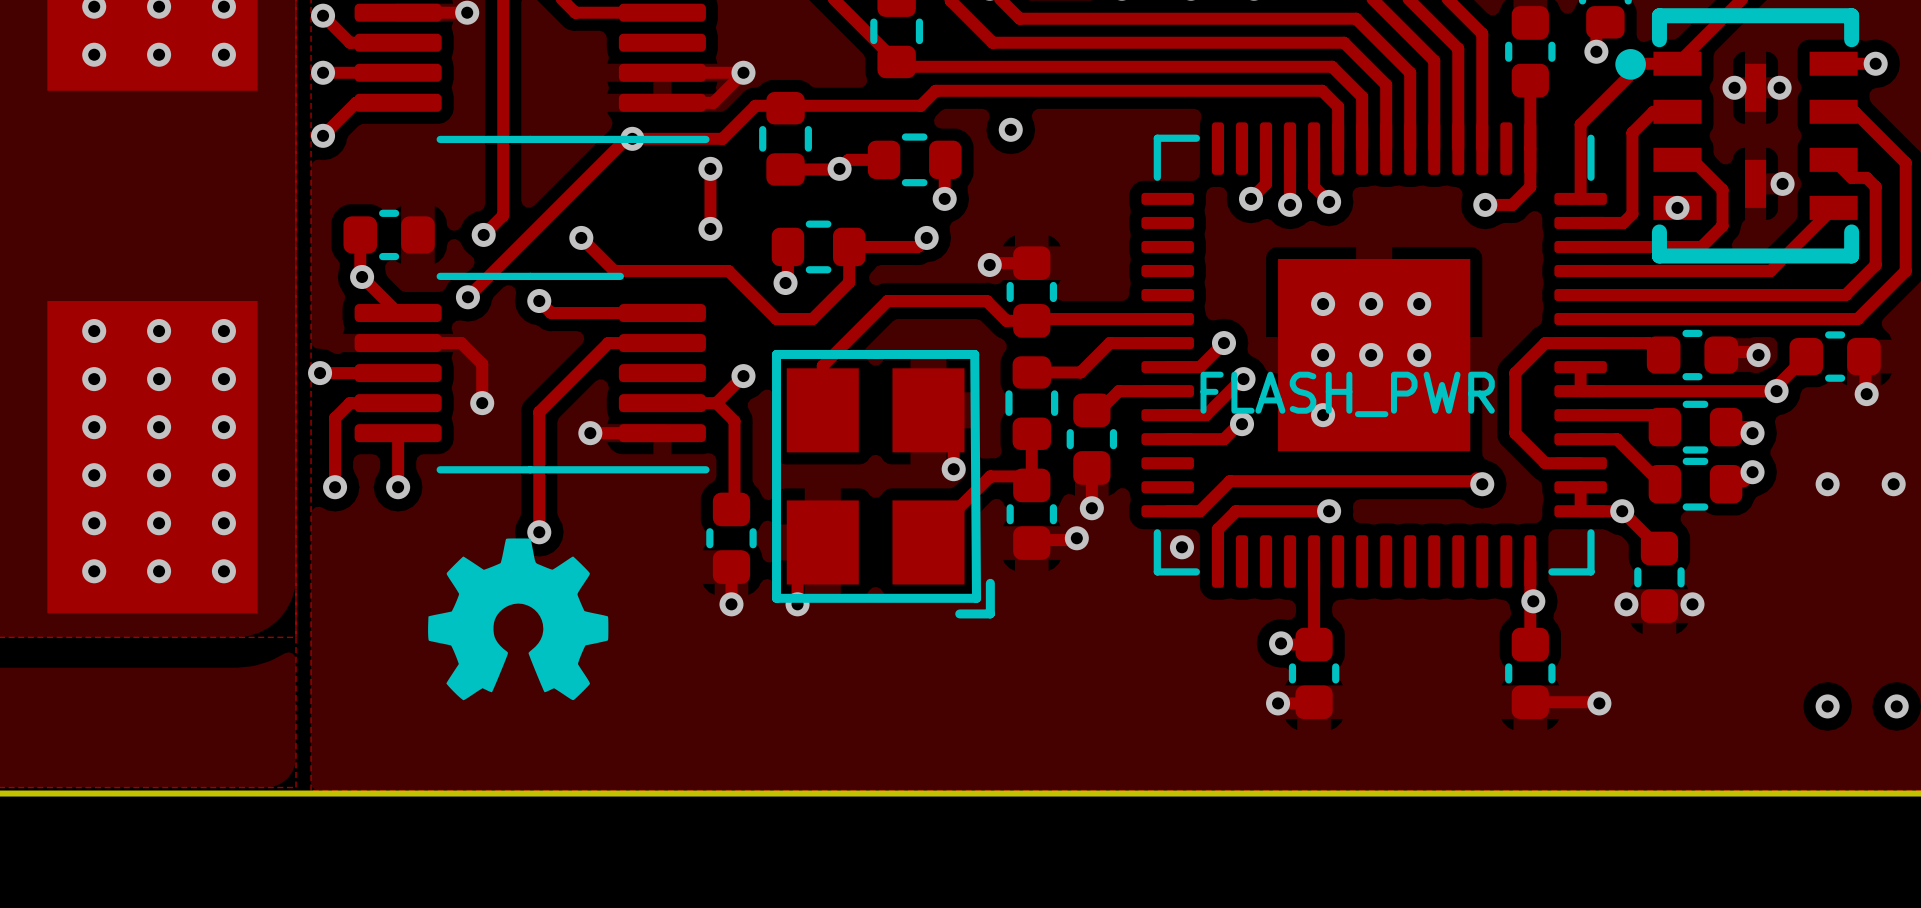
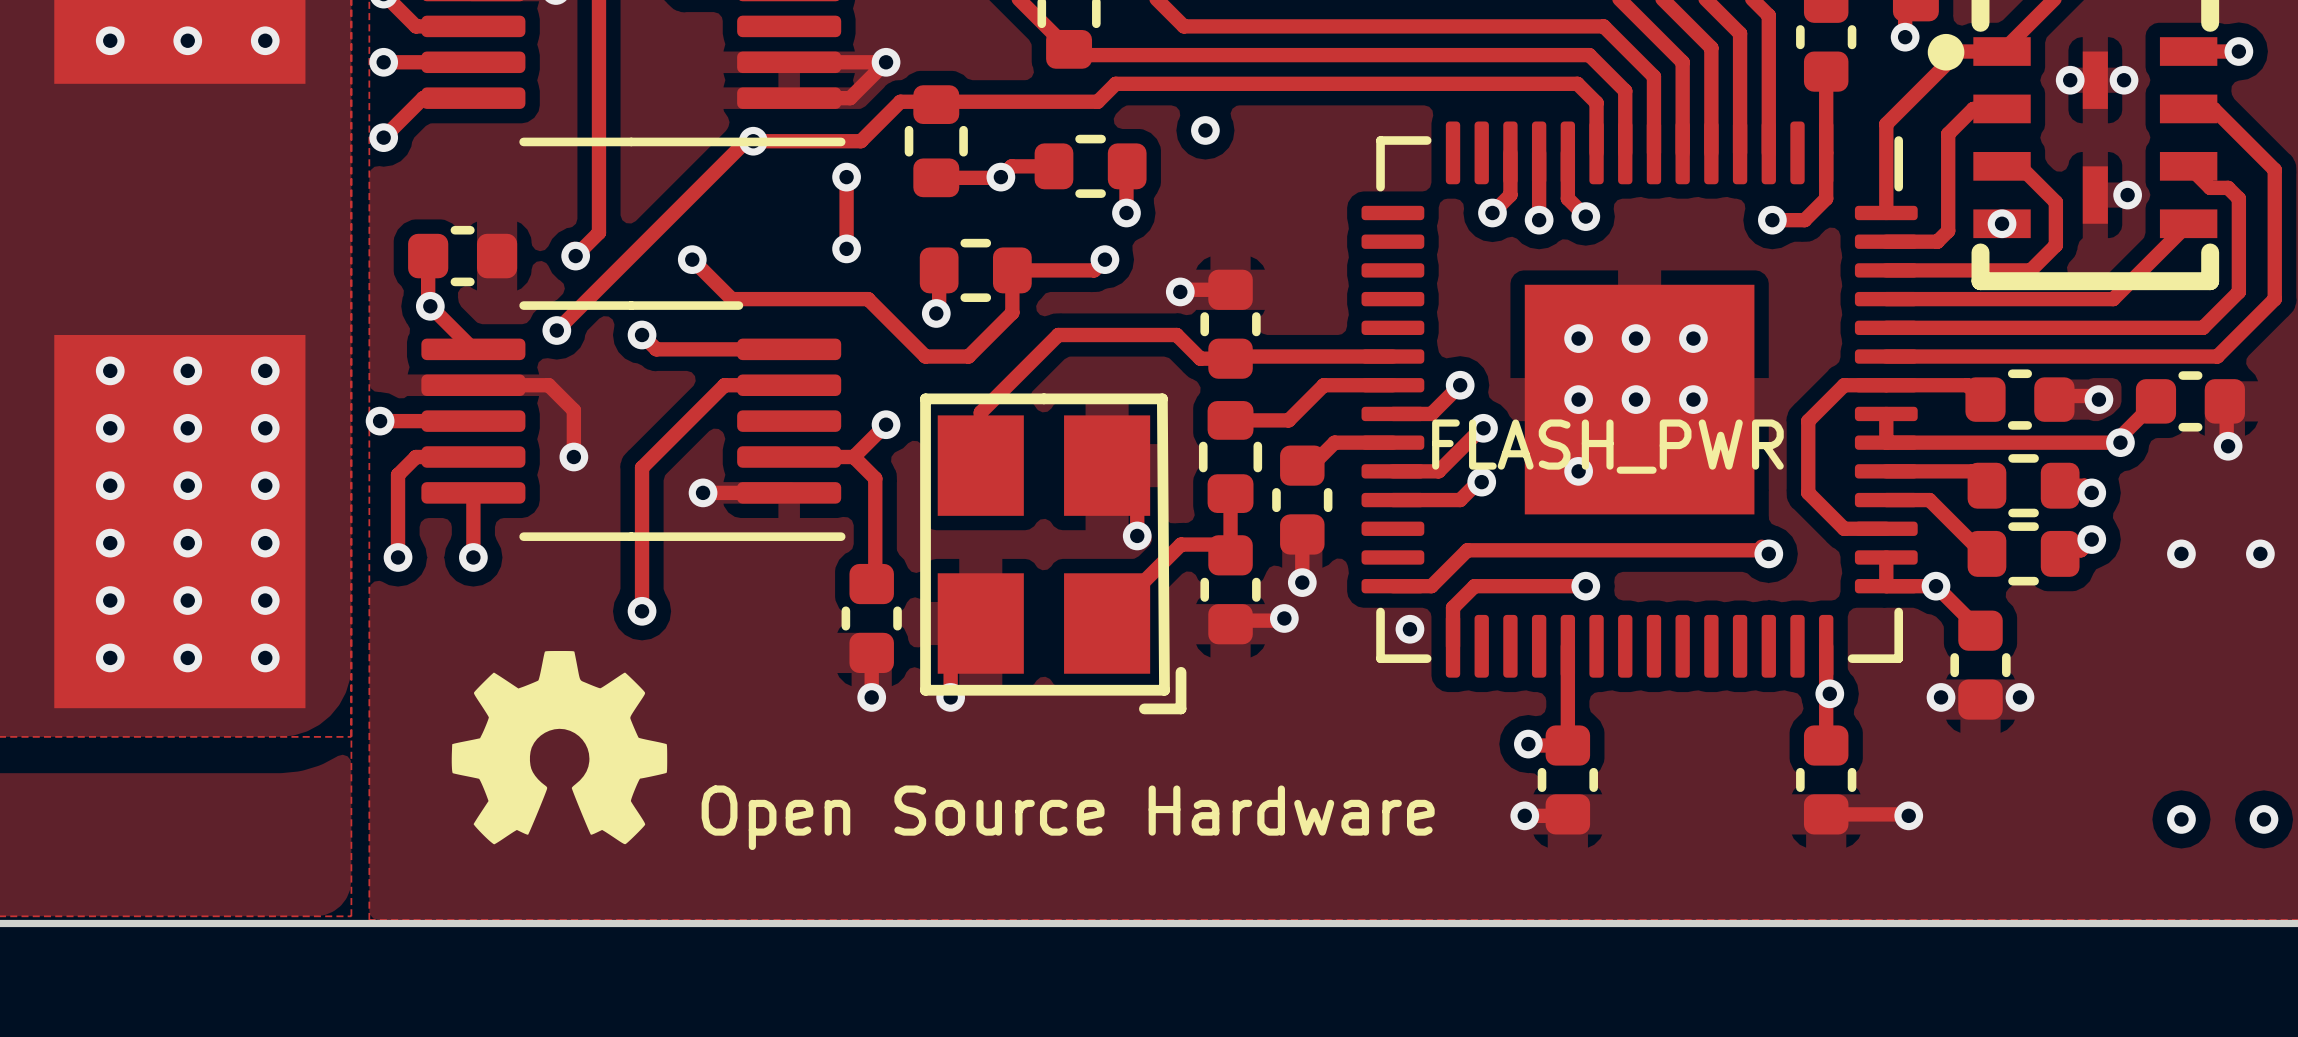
drawing position: (518, 619) -> (559, 747)
text: none -> Open Source Hardware (1068, 817)

